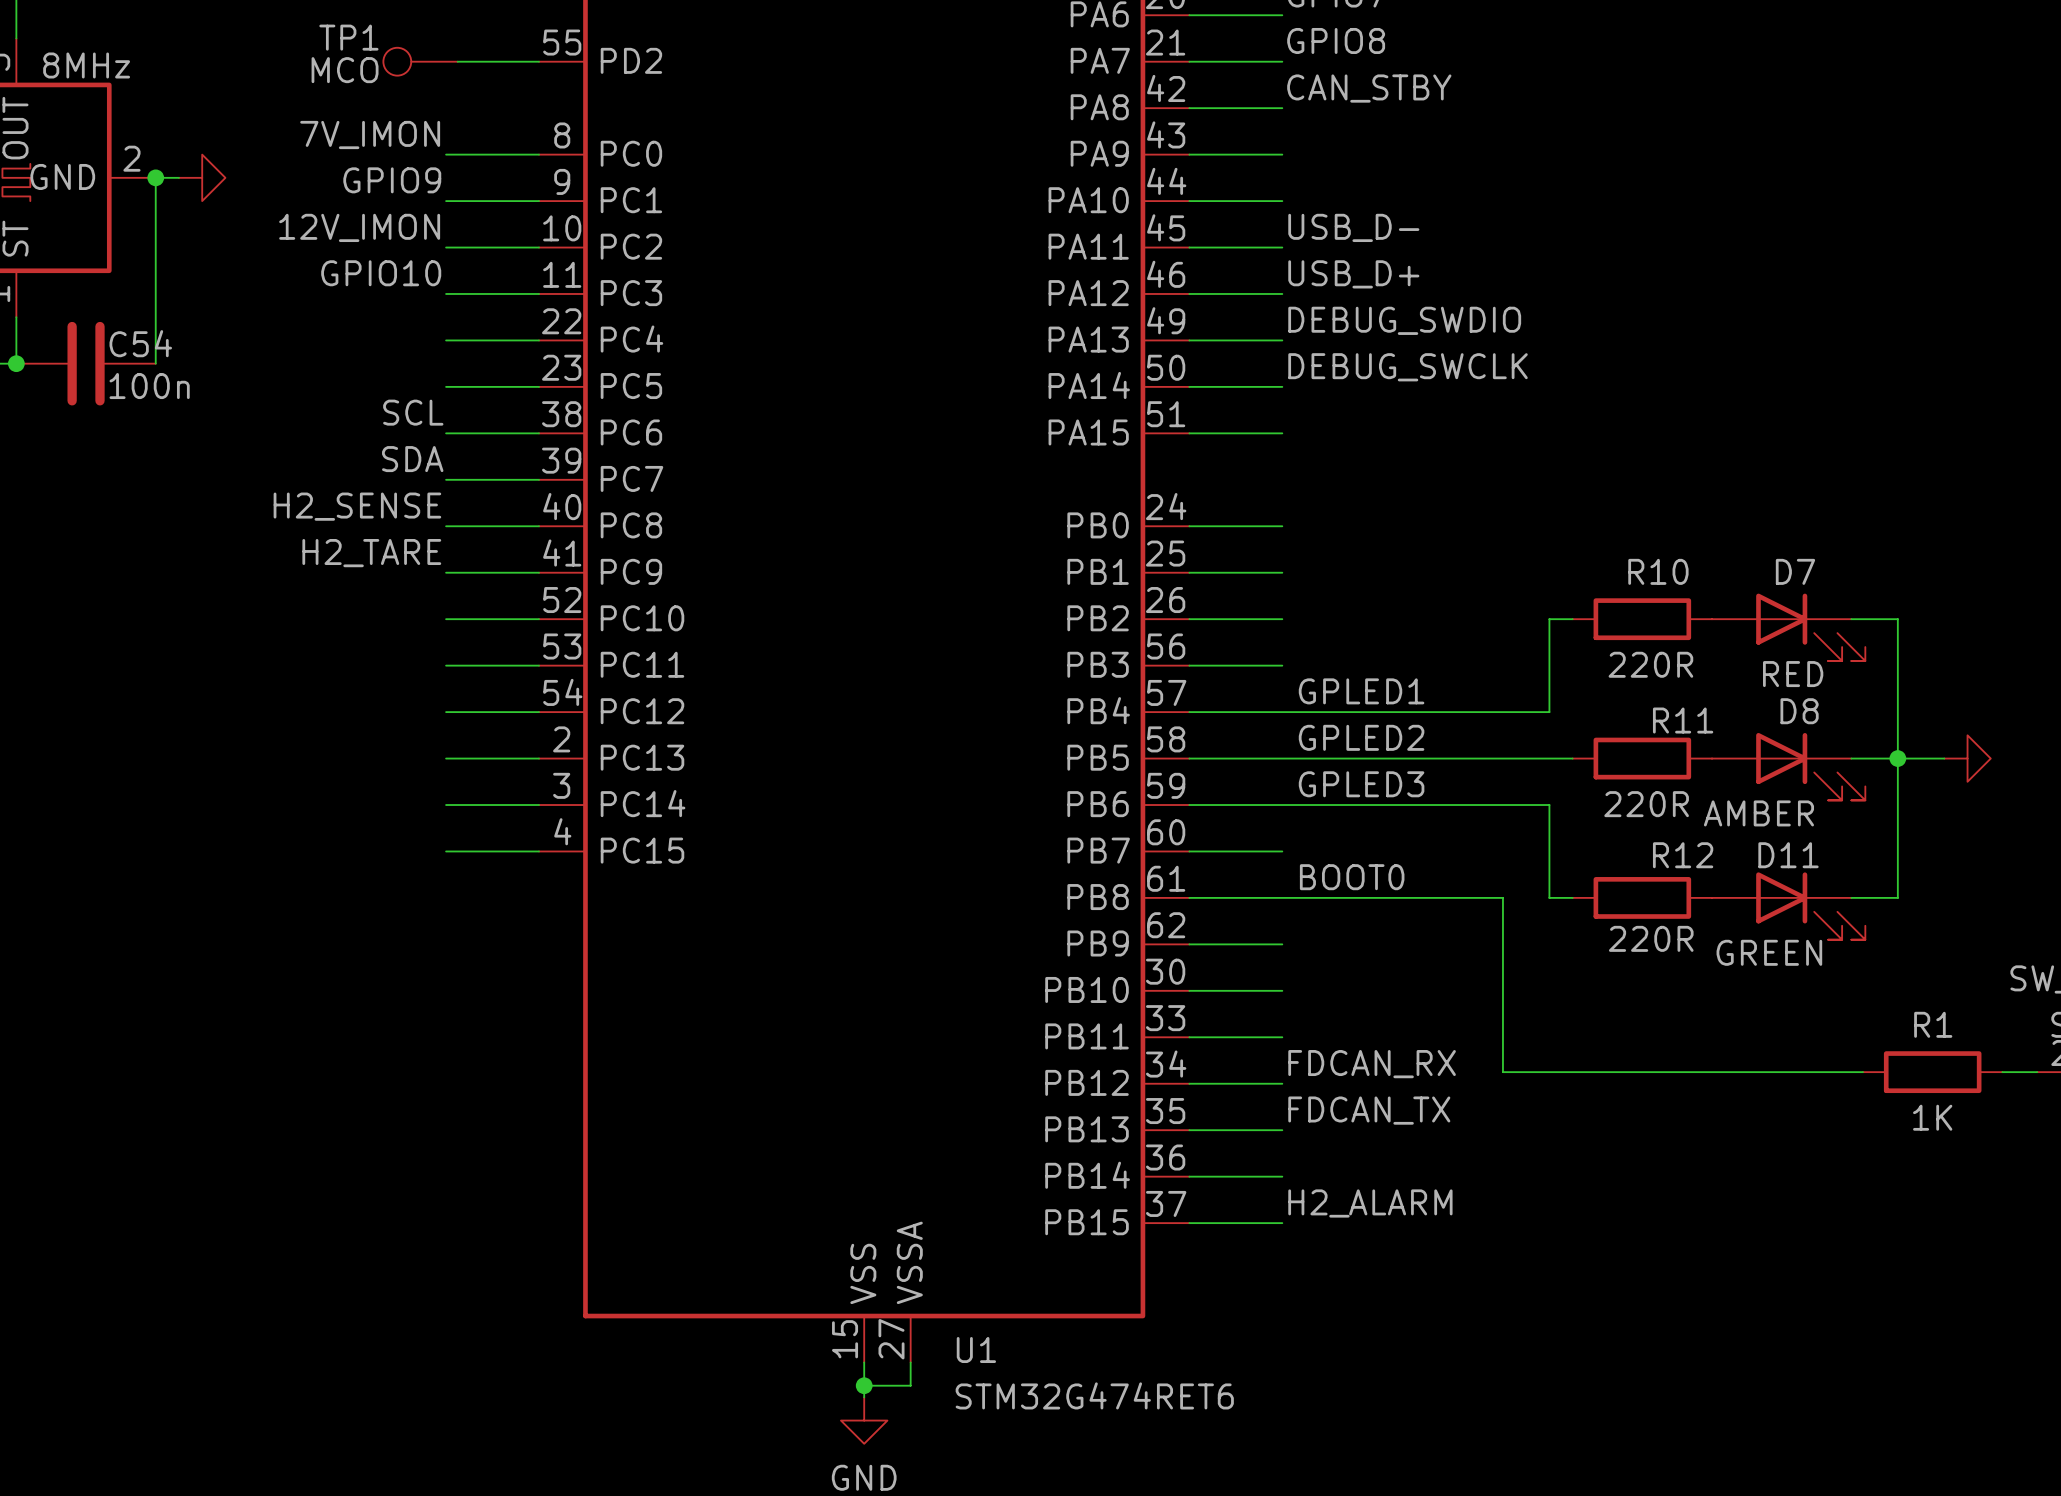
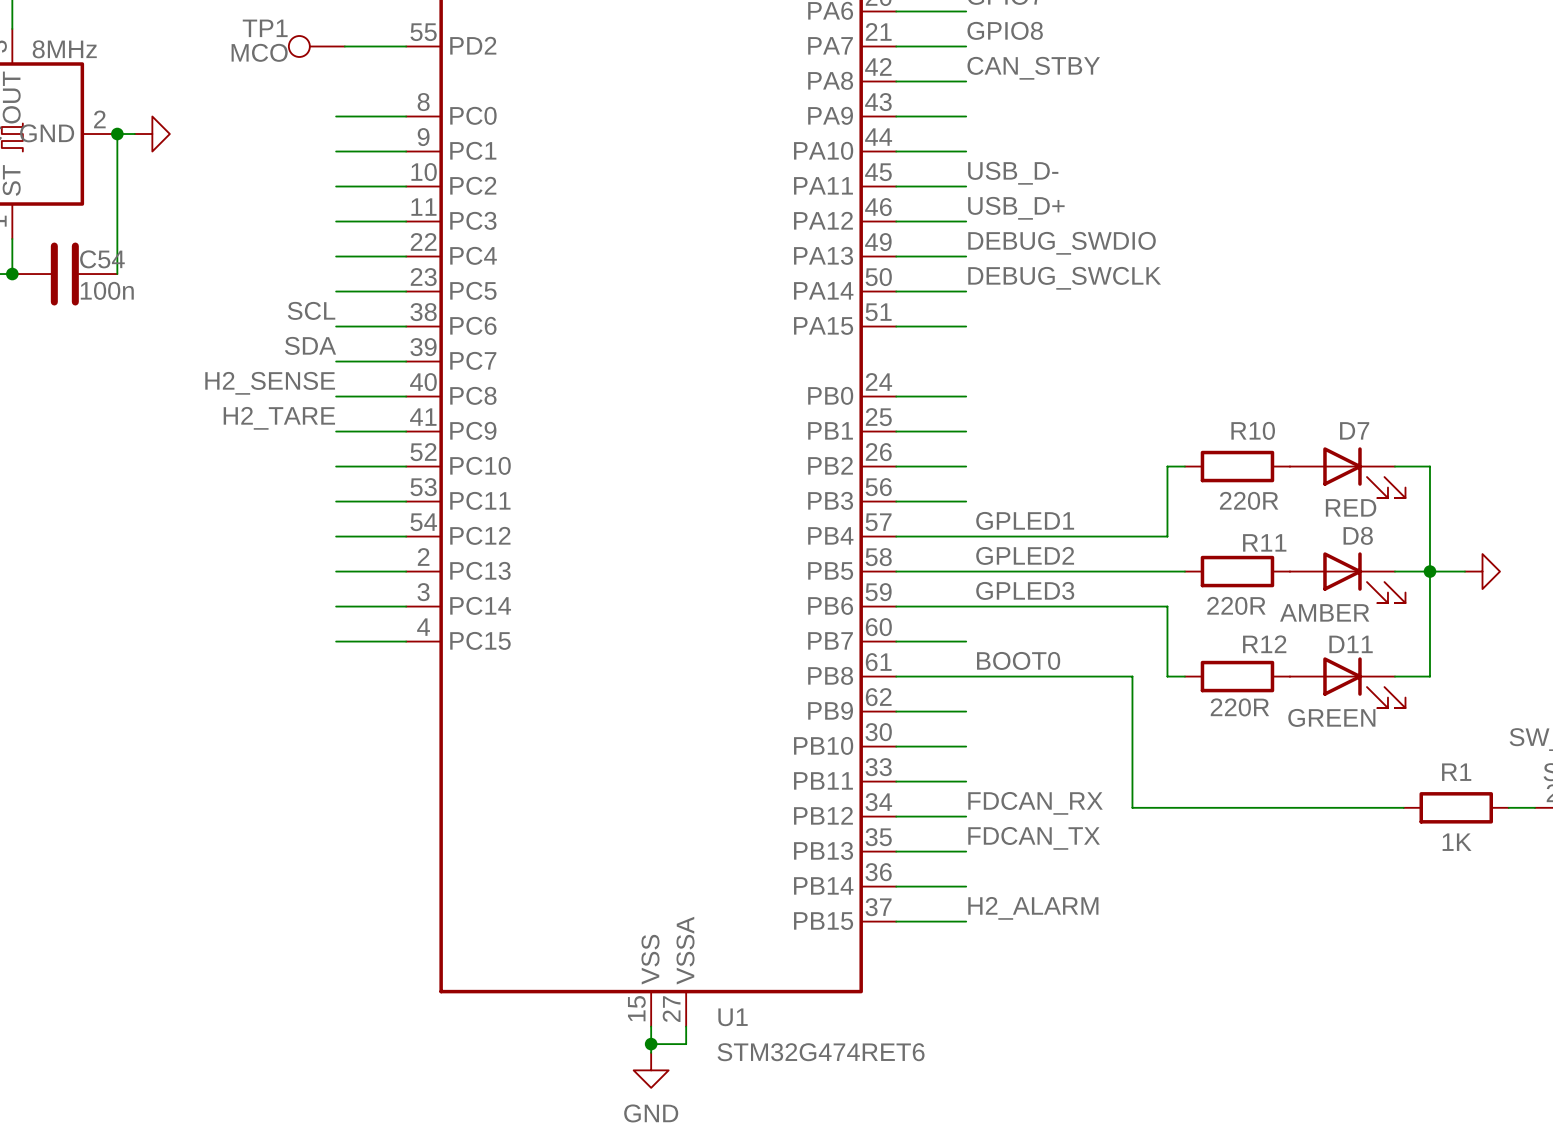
label: 7V_IMON (370, 135) -> none
label: GPIO9 (392, 180) -> none
label: 12V_IMON (359, 227) -> none
label: GPIO10 (381, 273) -> none

